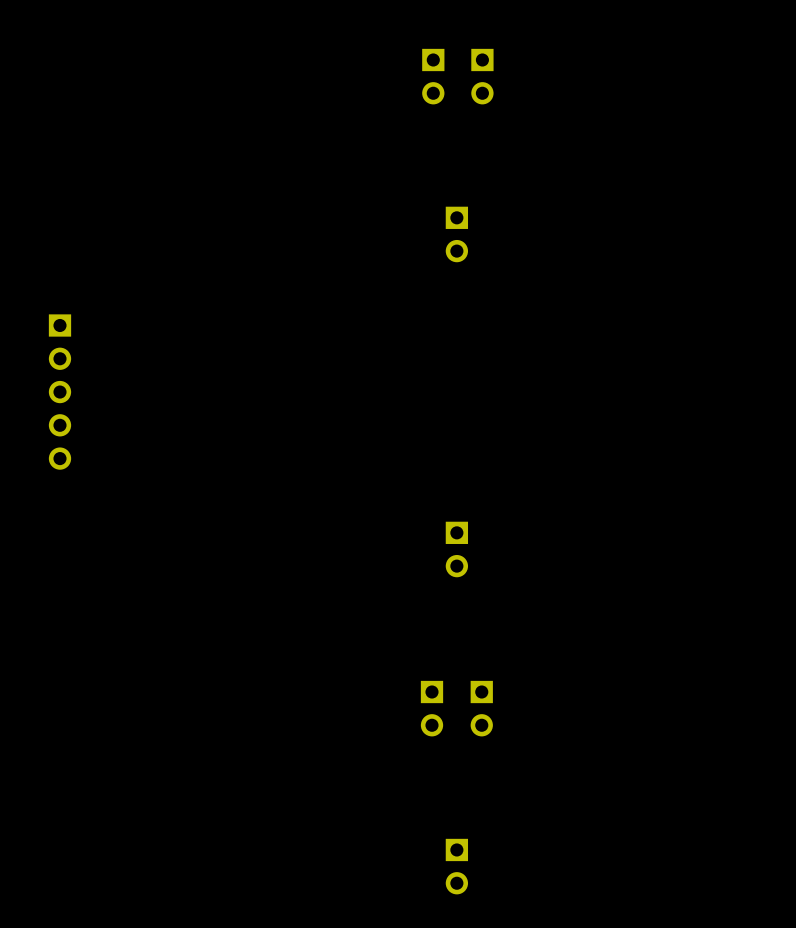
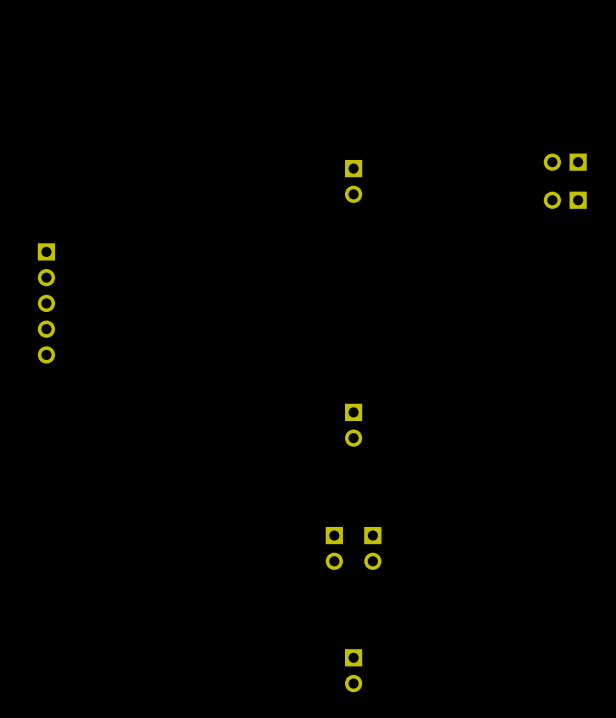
part: (433, 76) -> none
part: (482, 76) -> none
part: none -> (565, 162)
part: none -> (565, 200)

